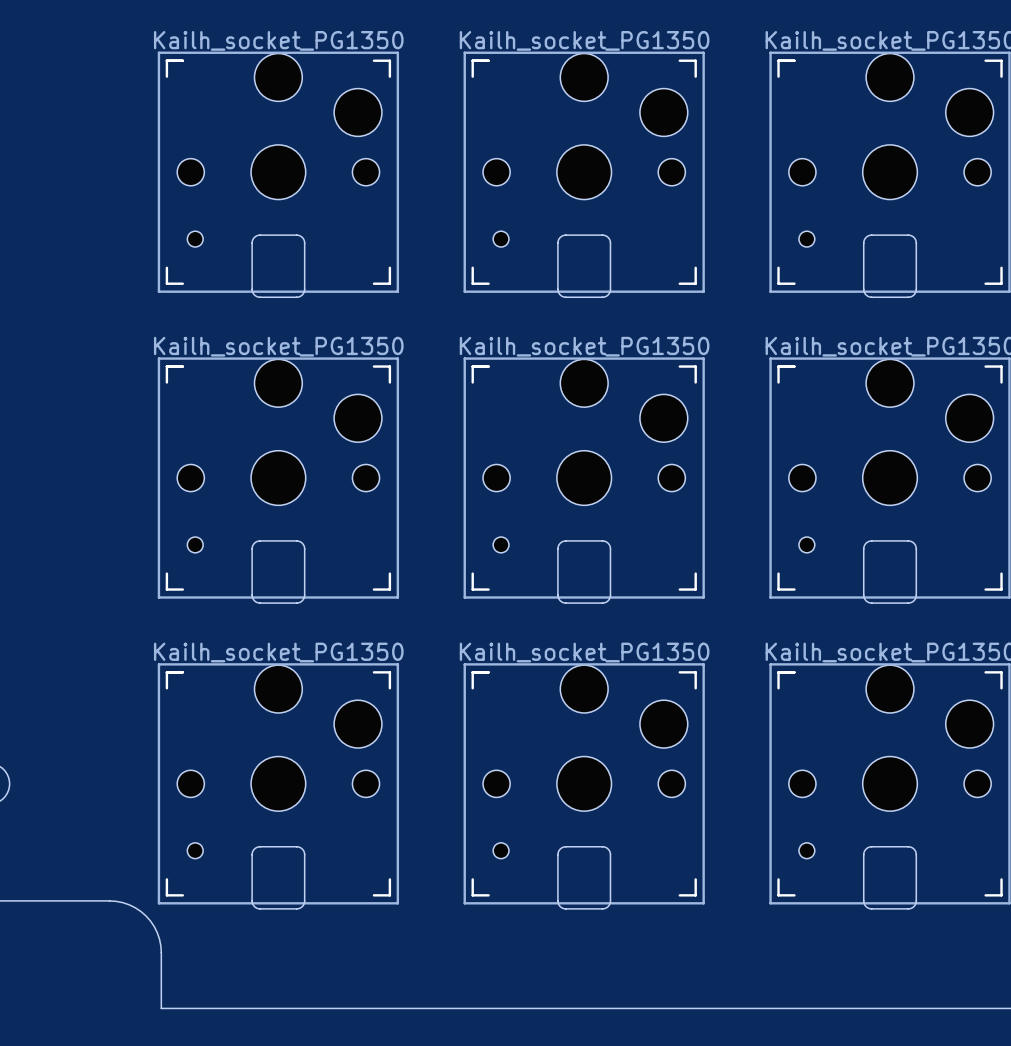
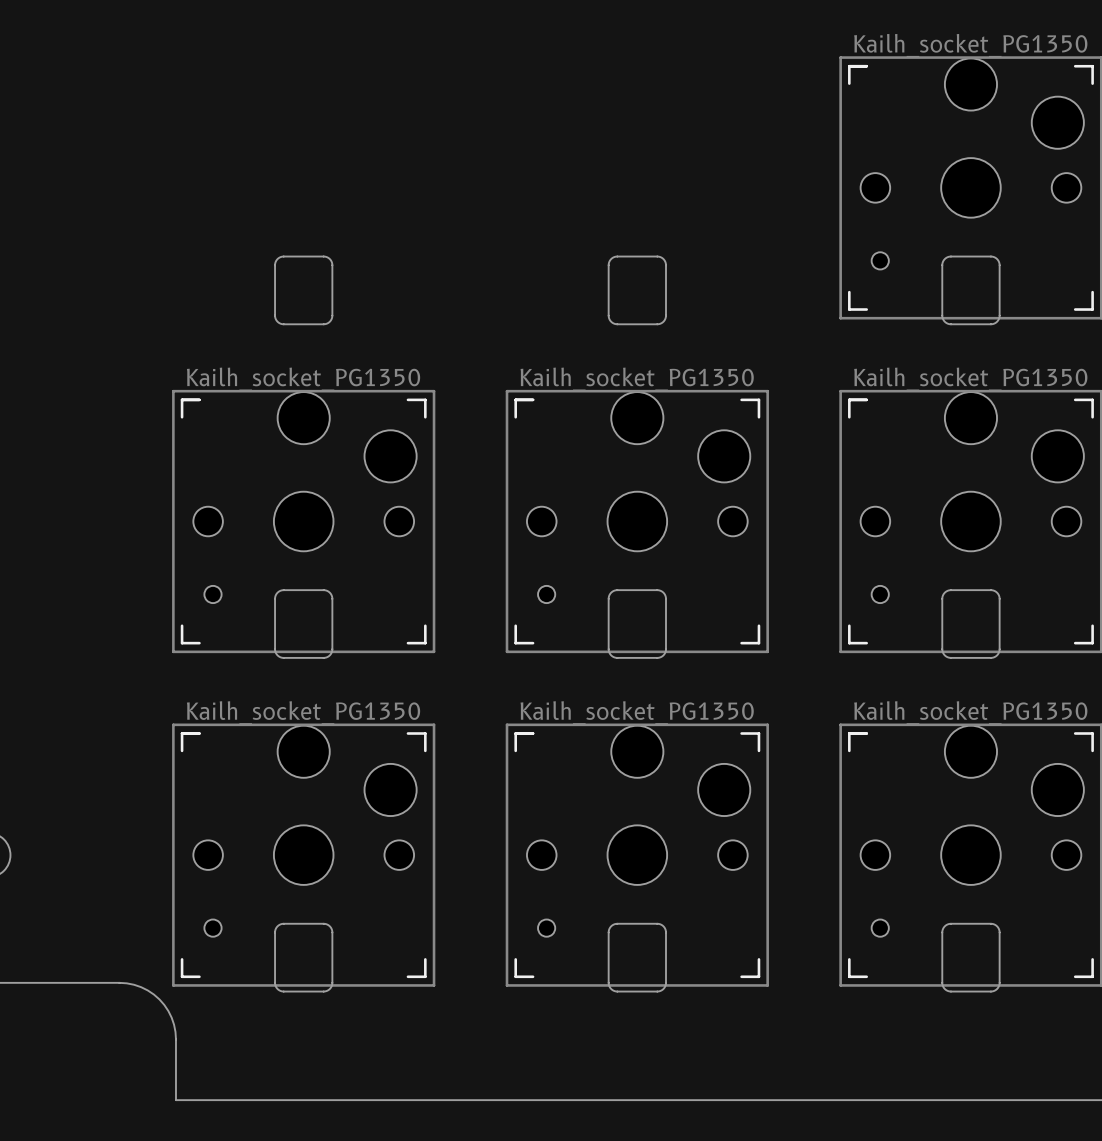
part: Kailh_socket_PG1350 (278, 172) -> none
part: Kailh_socket_PG1350 (584, 172) -> none

